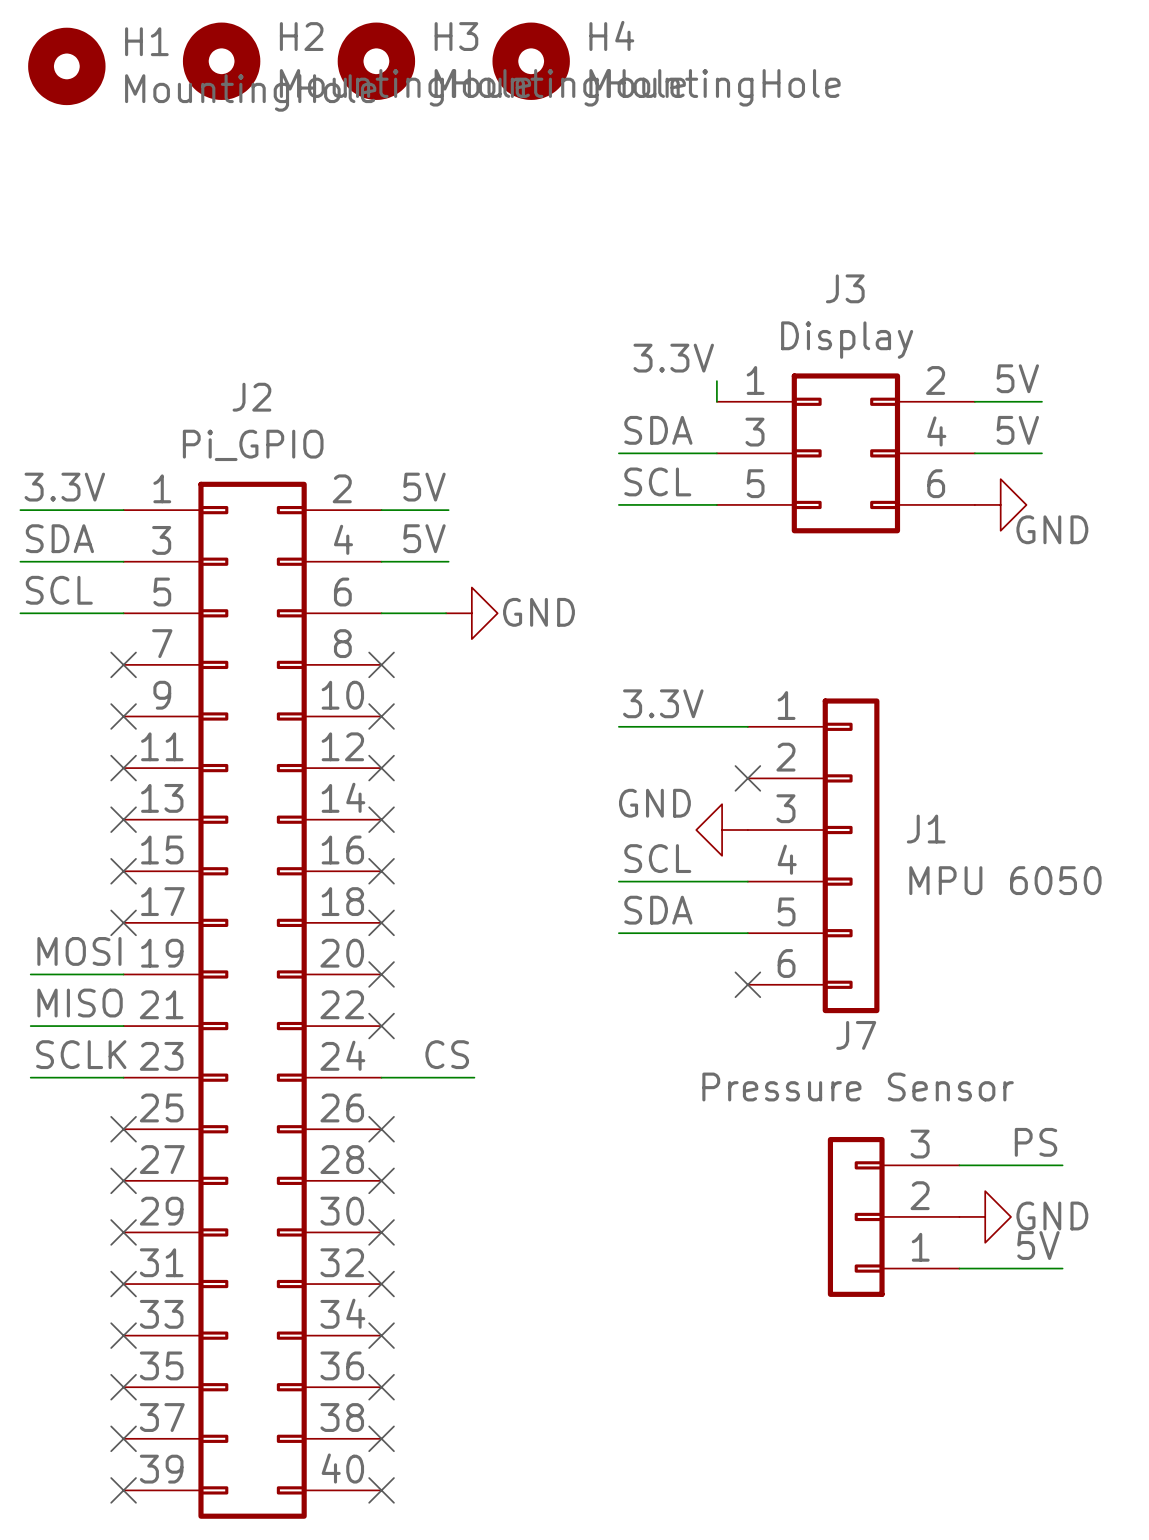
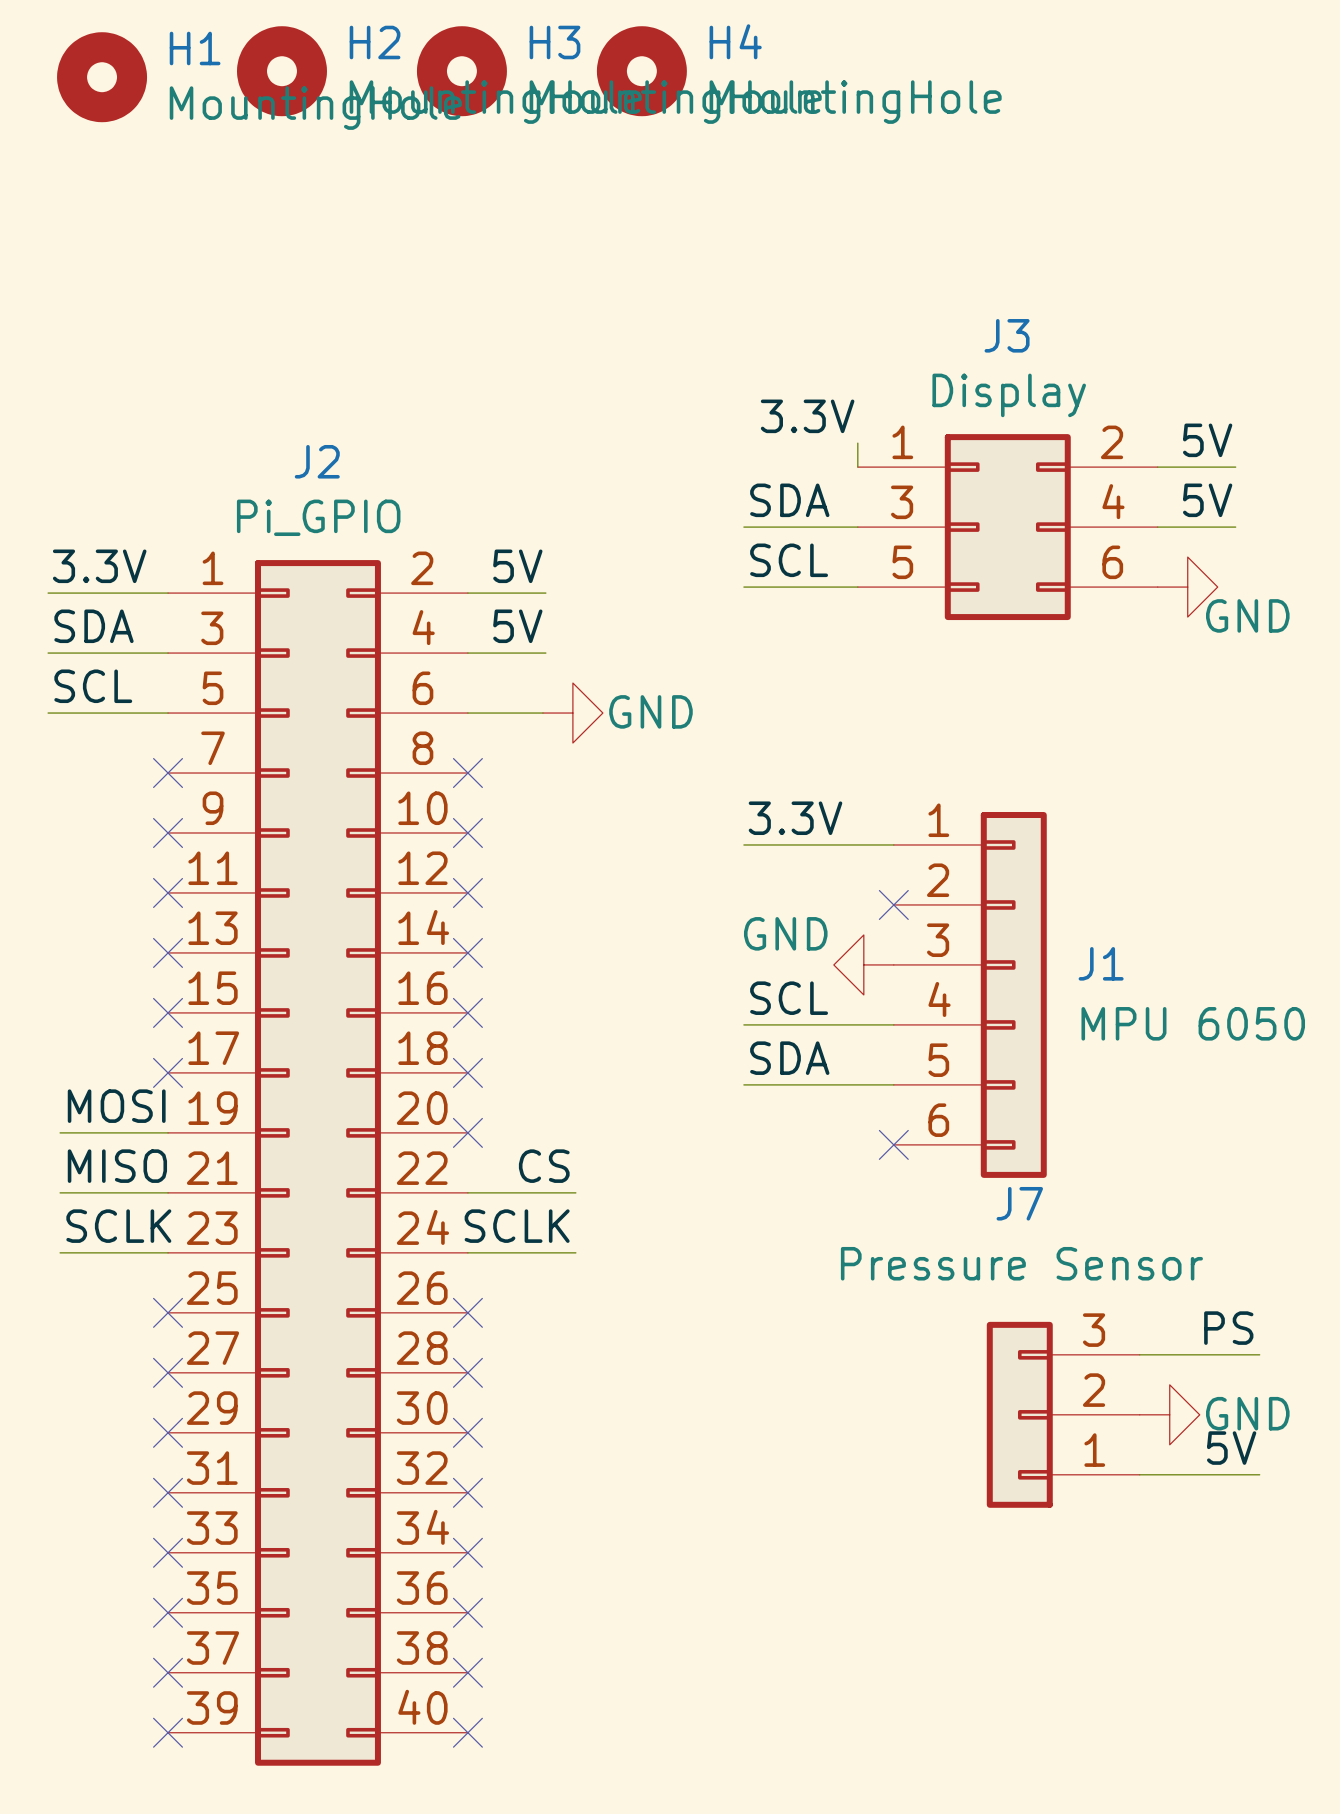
label: none -> CS (544, 1166)
wire: none -> (467, 1192) (575, 1192)
no-connect mark: (381, 1026) -> none
label: CS (447, 1054) -> SCLK (517, 1226)

